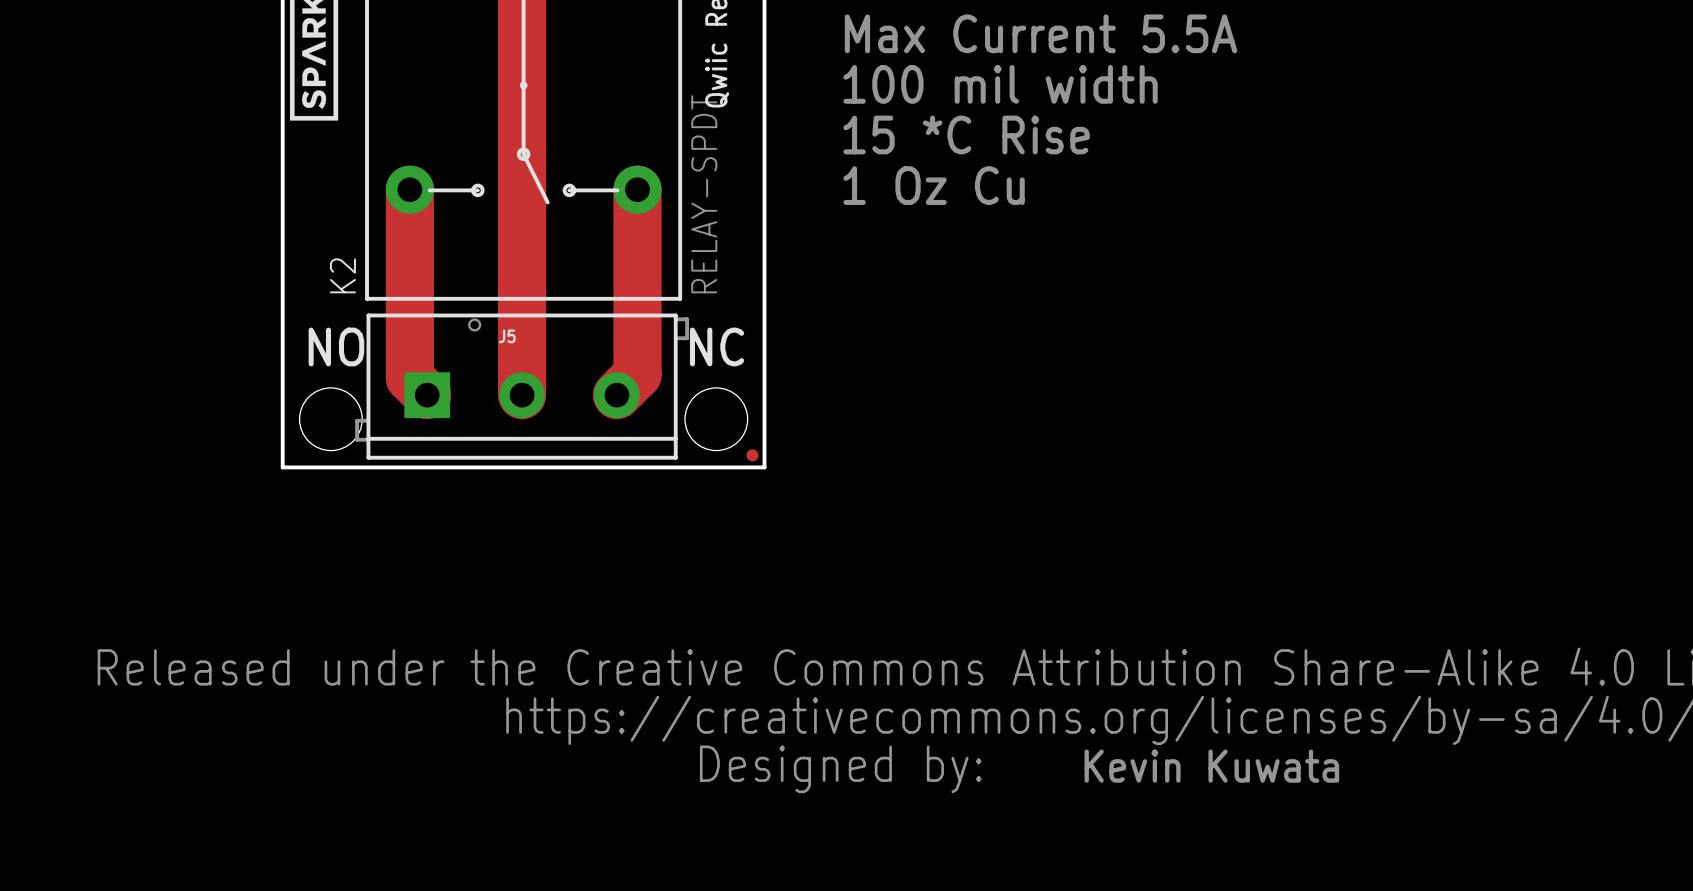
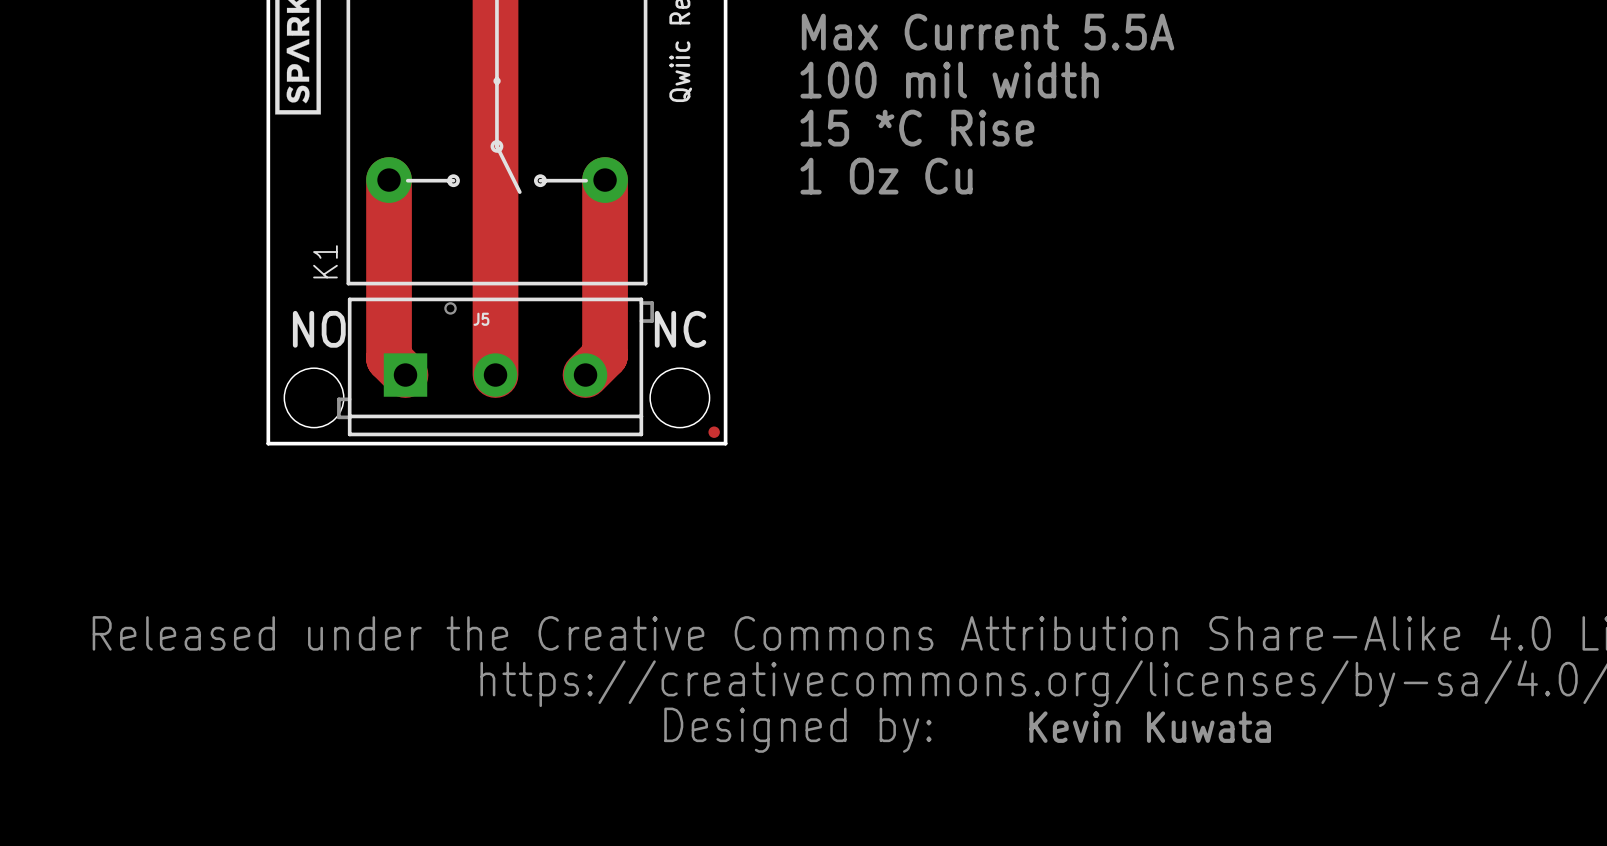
K2 value: RELAY-SPDT (704, 194) -> none
K2 name: K2 (342, 275) -> K1 (325, 261)

